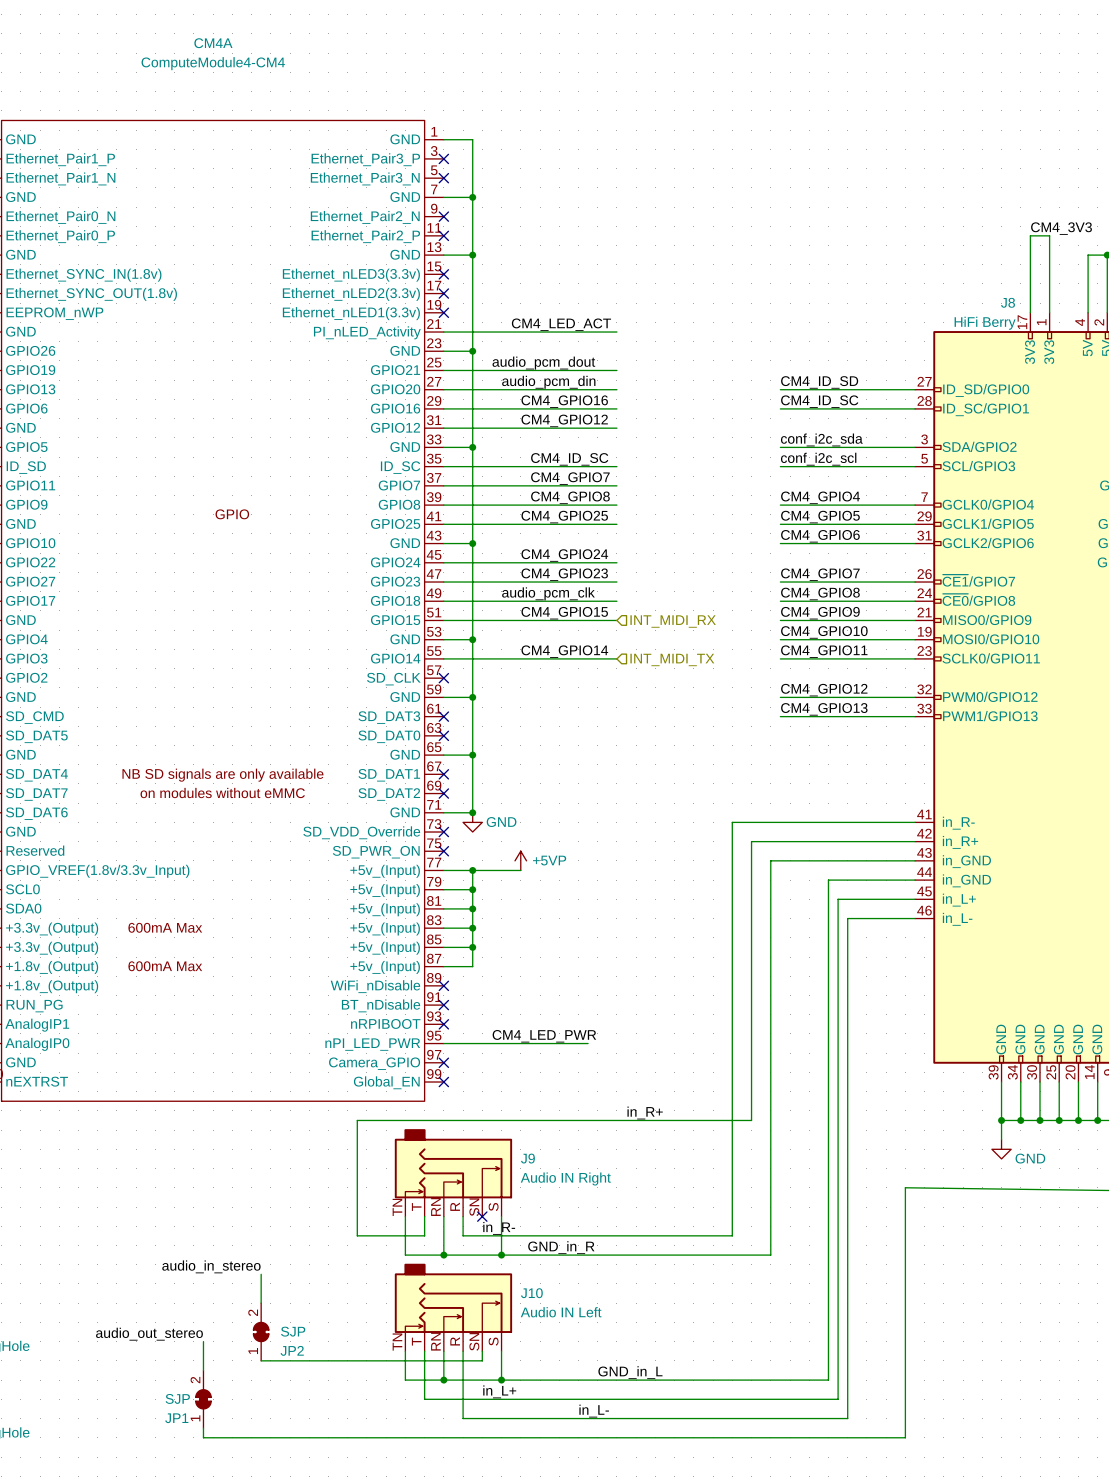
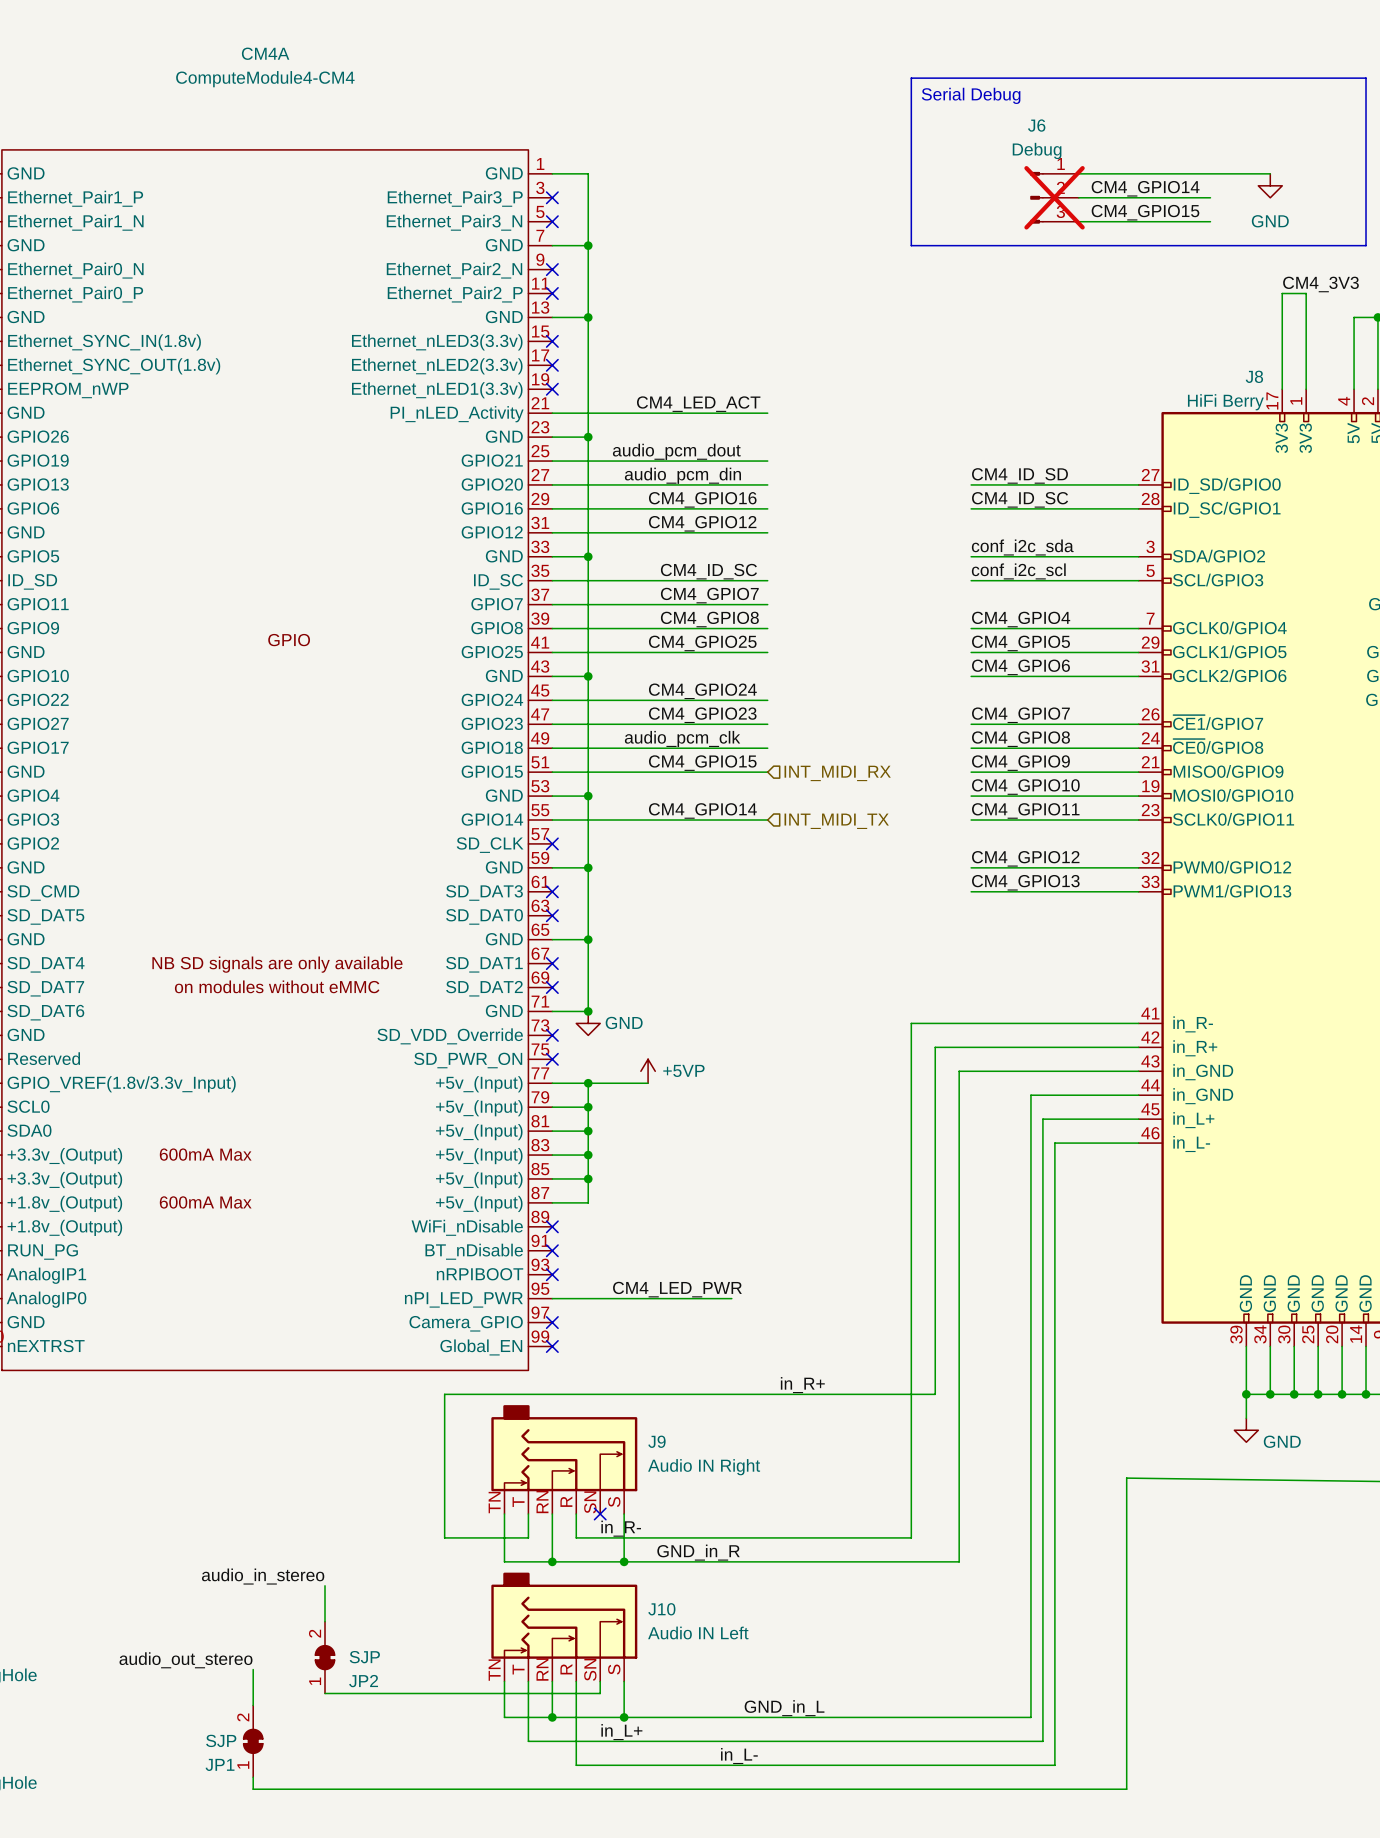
line: none -> (911, 78) (1366, 78) (1366, 245) (911, 245) (911, 78)
text: none -> Serial Debug (971, 95)
wire: none -> (1078, 173) (1270, 173)
power symbol: none -> GND (1270, 185)
label: none -> CM4_GPIO14 (1145, 188)
J6: none -> Debug (1054, 197)
wire: none -> (1078, 197) (1210, 197)
label: none -> CM4_GPIO15 (1145, 212)
wire: none -> (1078, 221) (1210, 221)

